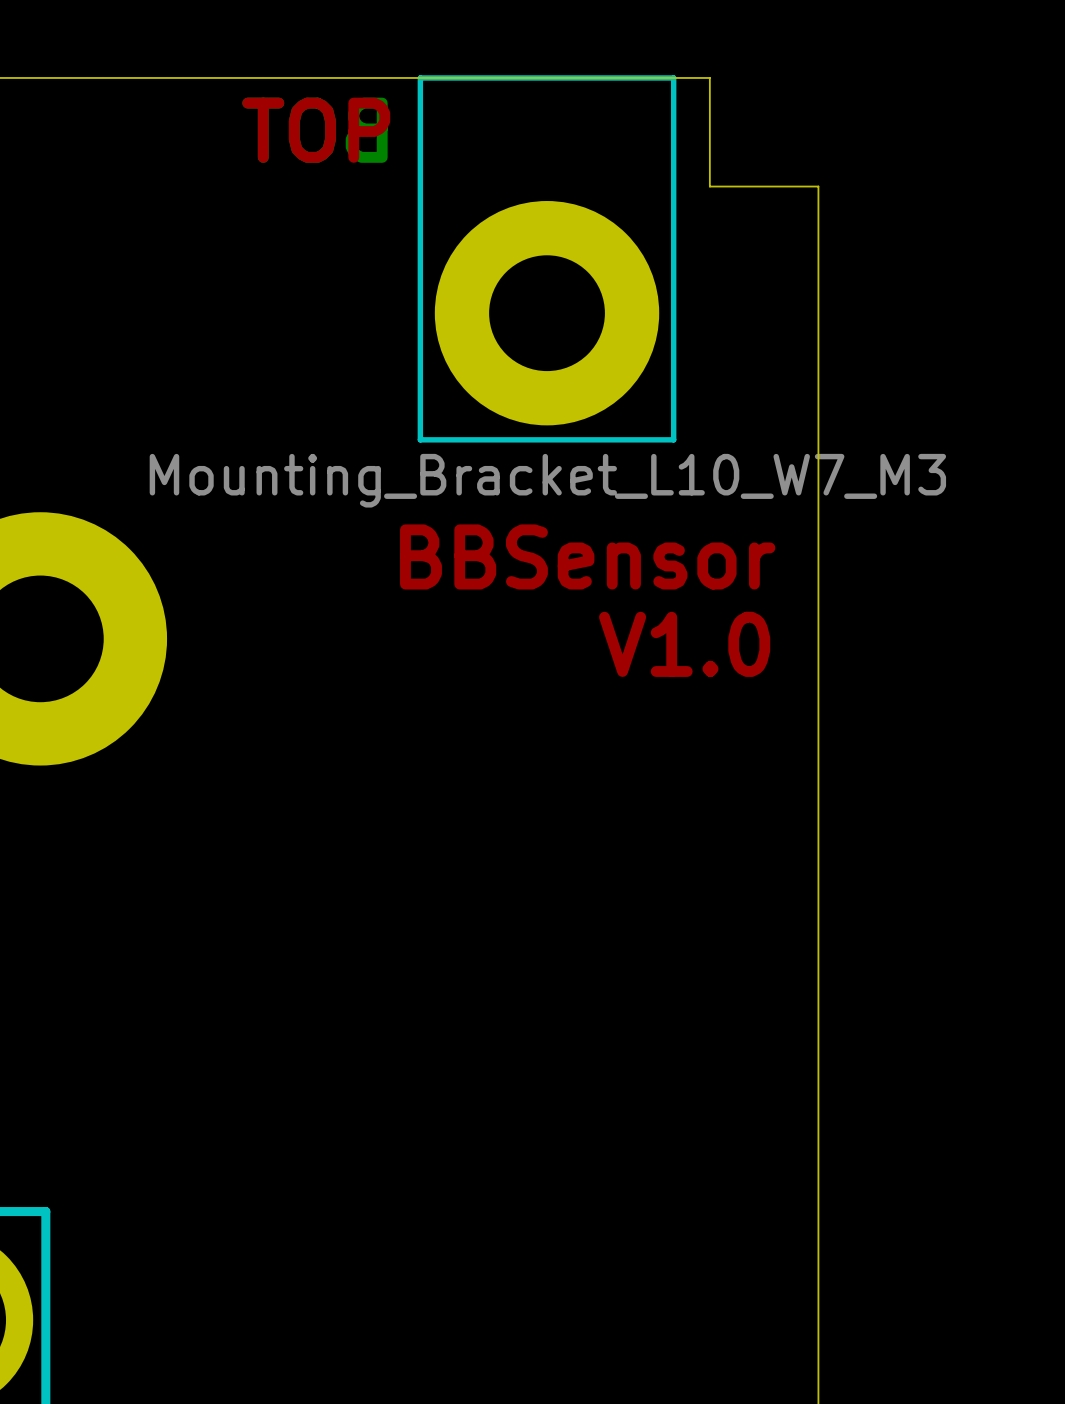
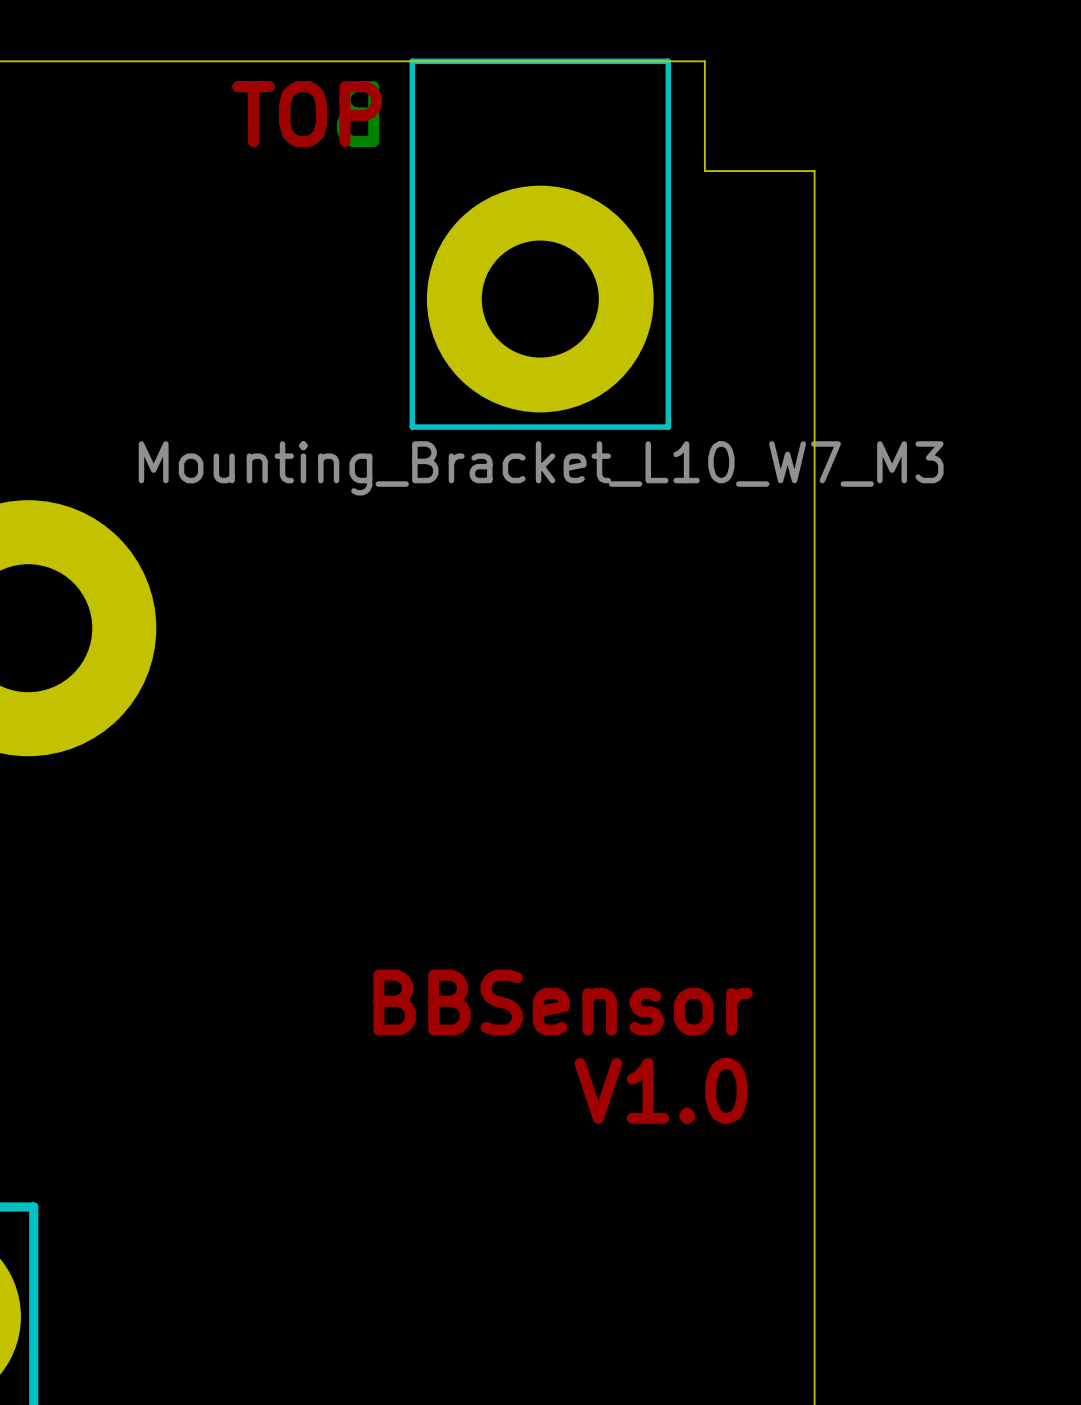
text position: BBSensor (587, 556) -> BBSensor (563, 1002)
text position: V1.0 (684, 644) -> V1.0 (661, 1090)

